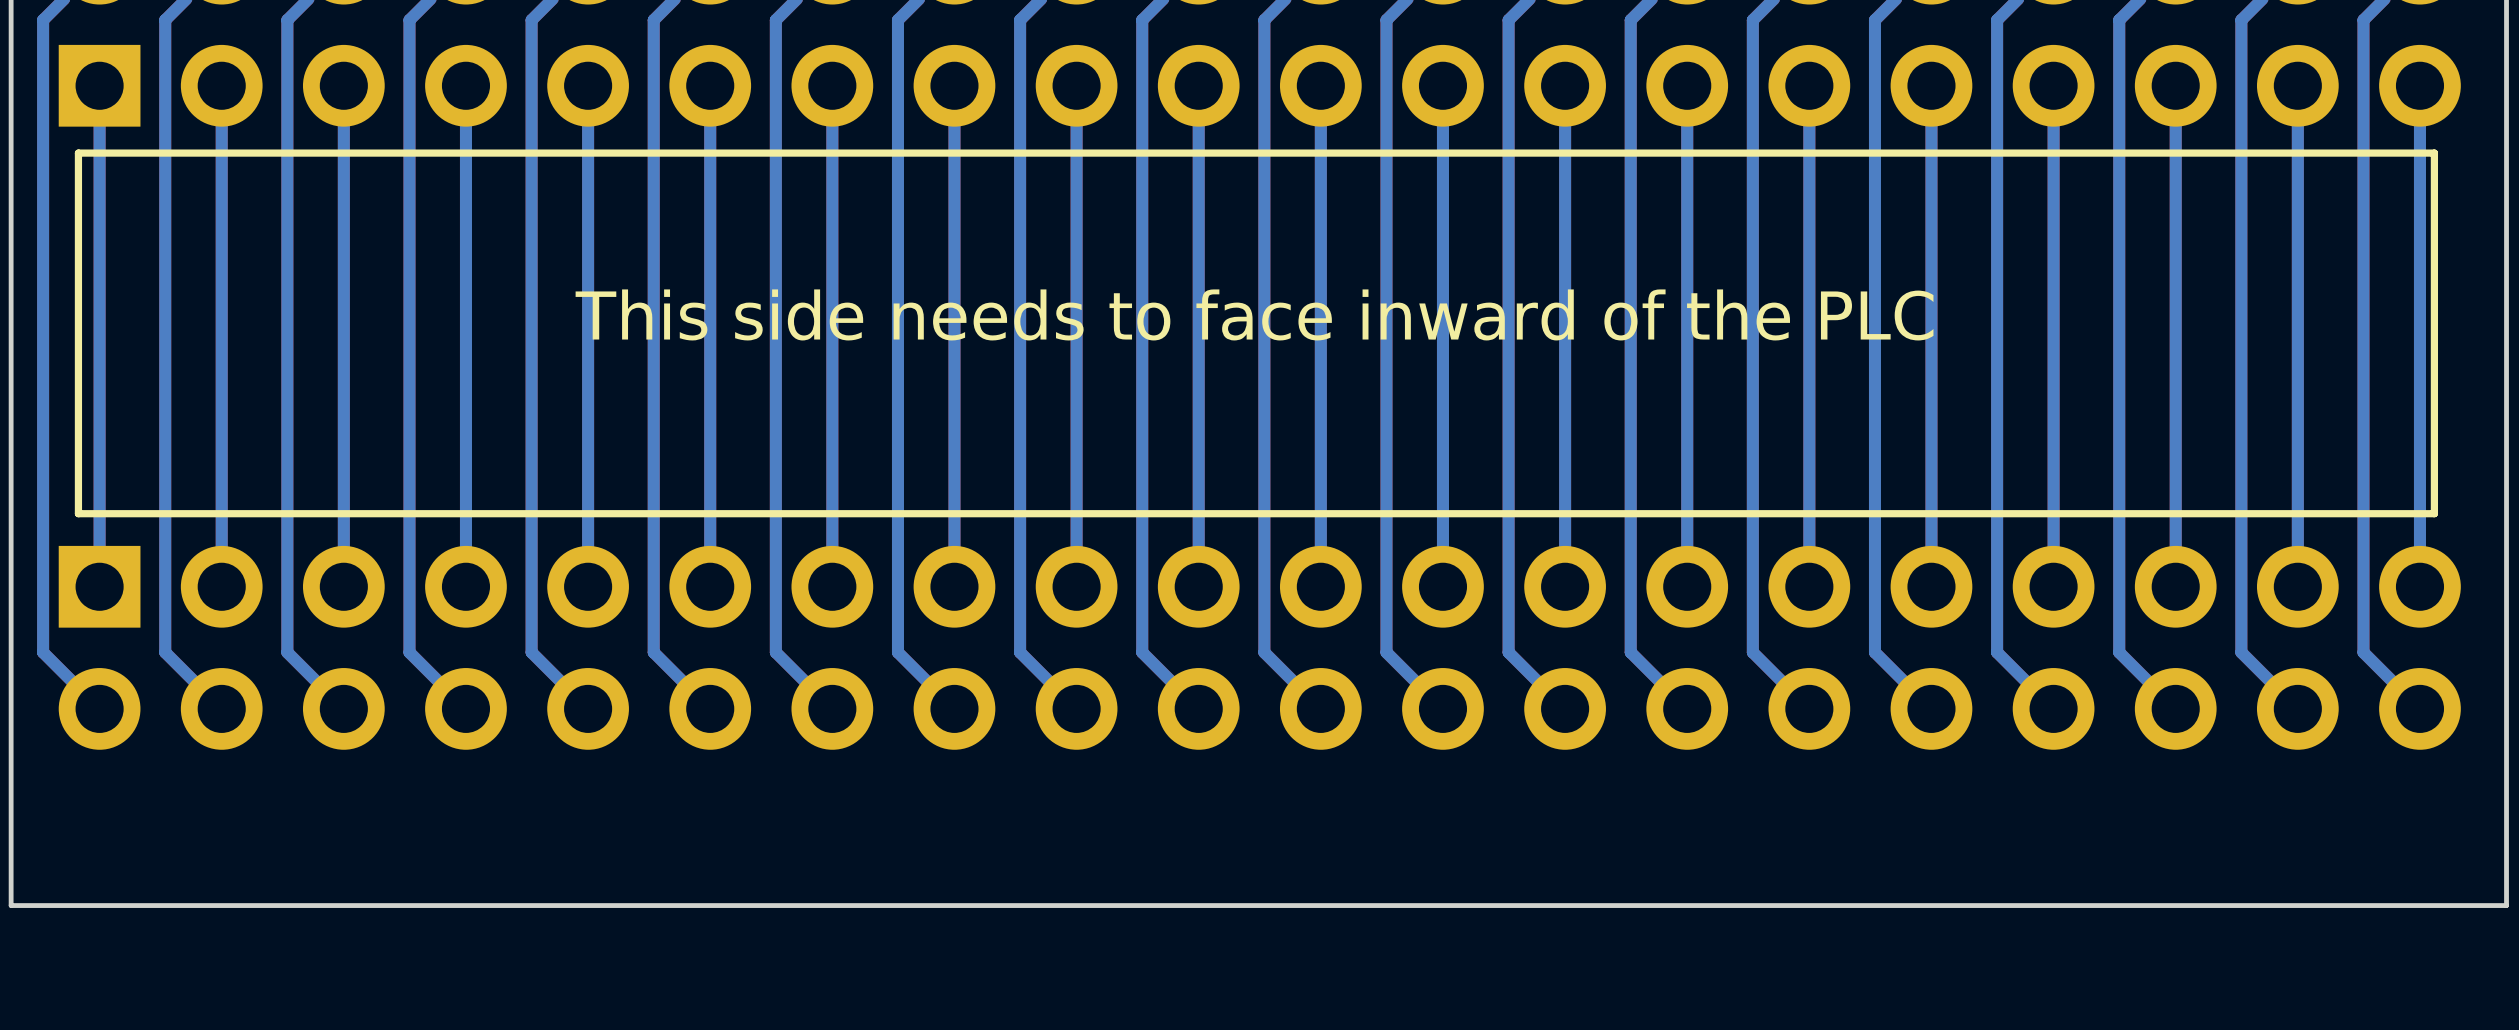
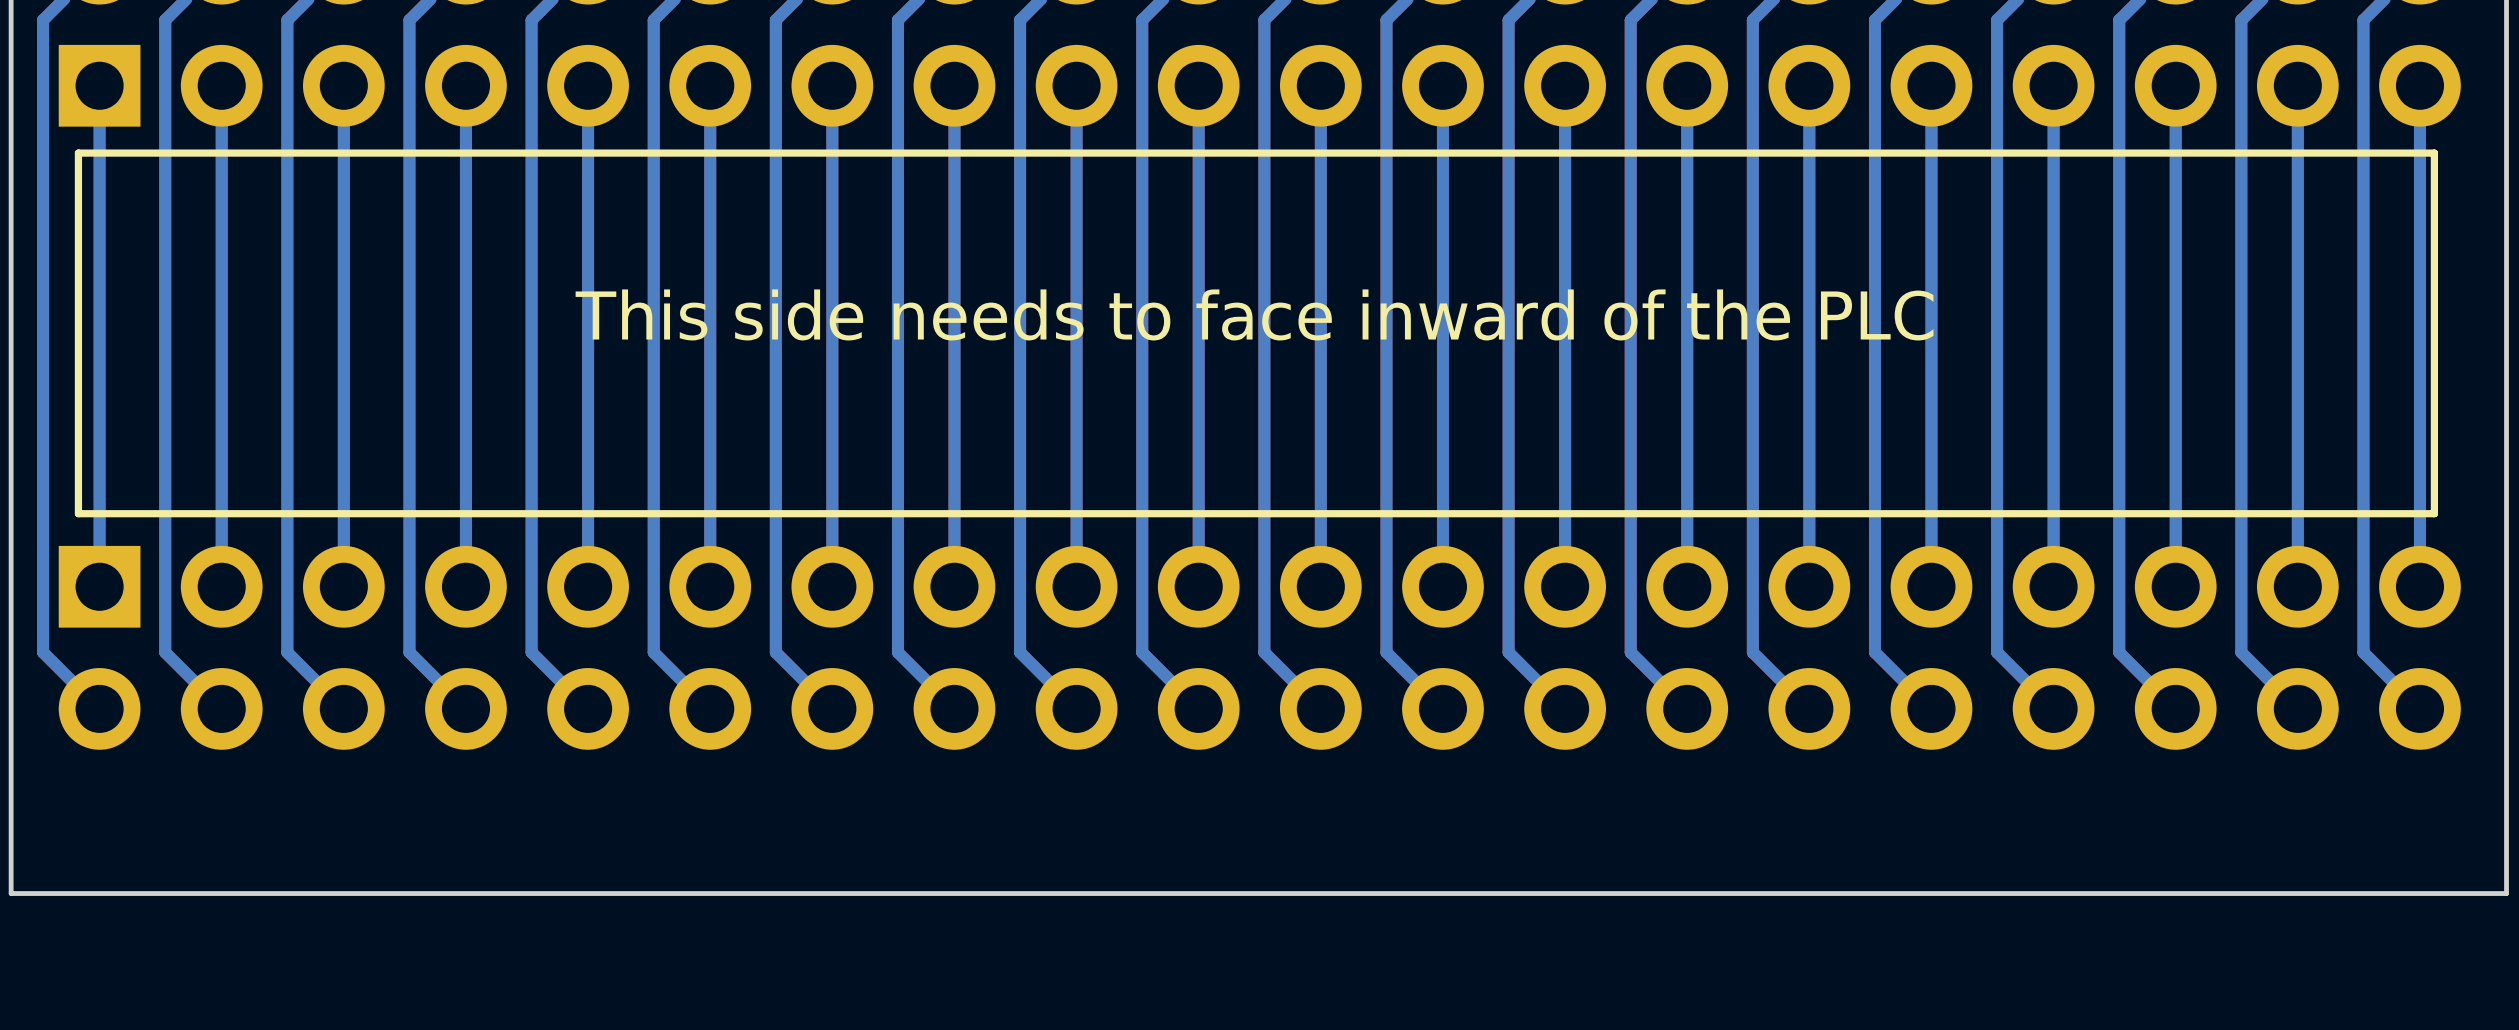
board edge: (2506, 893) (2506, 905) (11, 905) (11, 893) -> (2506, 893) (11, 893)

